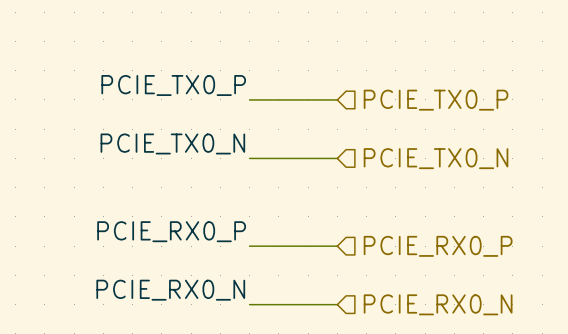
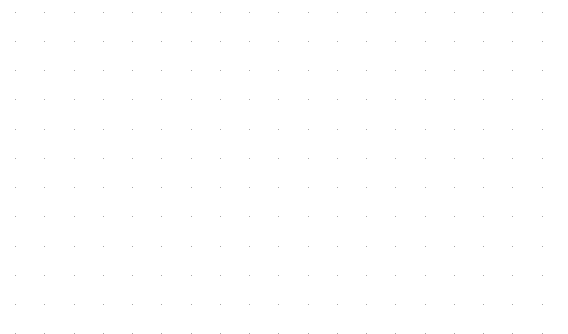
label: PCIE_TX0_P (173, 85) -> none
wire: (249, 99) (337, 99) -> none
hierarchical label: PCIE_TX0_P (436, 100) -> none
label: PCIE_TX0_N (172, 143) -> none
wire: (249, 158) (337, 158) -> none
hierarchical label: PCIE_TX0_N (436, 158) -> none
label: PCIE_RX0_P (171, 231) -> none
wire: (249, 246) (337, 246) -> none
hierarchical label: PCIE_RX0_P (438, 246) -> none
label: PCIE_RX0_N (170, 290) -> none
wire: (249, 304) (337, 304) -> none
hierarchical label: PCIE_RX0_N (438, 304) -> none

